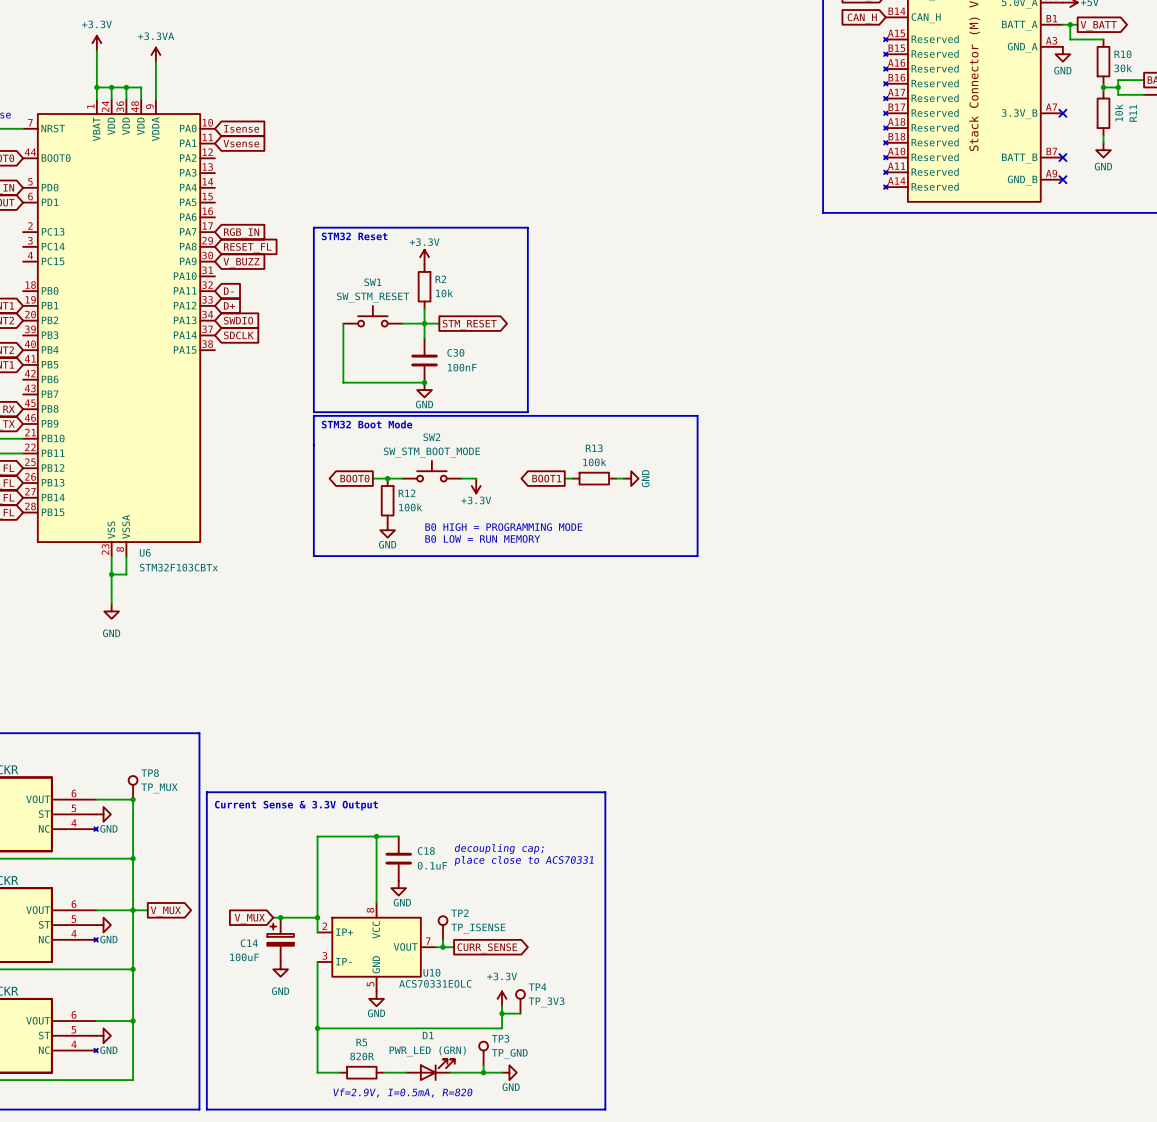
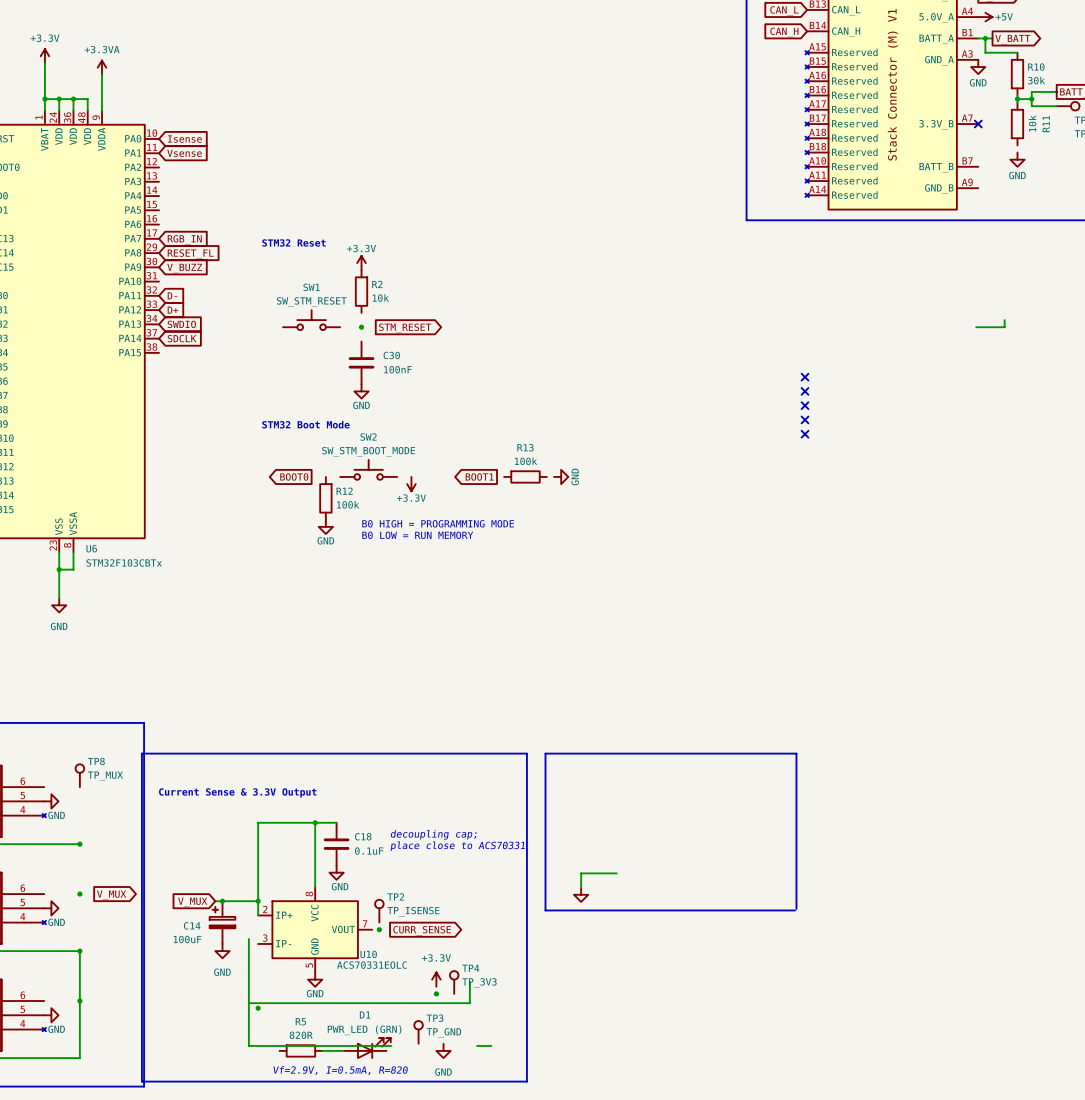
wire: (1103, 135) (1103, 142) -> none
no-connect mark: (1062, 157) -> none
no-connect mark: (1062, 179) -> none
line: (313, 227) (313, 412) (527, 412) (527, 227) (313, 227) -> none
wire: (424, 308) (424, 338) -> none
wire: none -> (1004, 320) (1004, 327) (976, 327)
wire: (343, 323) (343, 382) (424, 382) -> none
wire: (402, 323) (439, 323) -> none
no-connect mark: none -> (805, 377)
junction: (424, 382) -> none
no-connect mark: none -> (805, 391)
no-connect mark: none -> (805, 405)
line: (313, 415) (313, 556) (697, 556) (697, 415) (313, 415) -> none
no-connect mark: none -> (805, 419)
no-connect mark: none -> (805, 434)
wire: (372, 478) (402, 478) -> none
junction: (387, 478) -> none
wire: (461, 478) (476, 478) -> none
wire: (564, 478) (572, 478) -> none
wire: (616, 478) (623, 478) -> none
line: (206, 792) (605, 792) (605, 1109) (206, 1109) (206, 792) -> (141, 753) (141, 1081) (526, 1081) (526, 753) (141, 753)
wire: (96, 799) (133, 799) (133, 969) -> none
junction: (133, 799) -> none
wire: none -> (616, 873) (581, 873) (581, 887)
wire: (96, 910) (147, 910) -> none
power symbol: none -> (581, 894)
line: none -> (796, 909) (796, 753) (545, 753) (545, 910) (795, 910)
wire: (442, 939) (442, 947) -> none
wire: (435, 947) (454, 947) -> none
wire: none -> (248, 938) (248, 1045) (391, 1045)
wire: (317, 961) (317, 1072) (339, 1072) -> none
wire: none -> (469, 981) (469, 1003) (248, 1003)
wire: (502, 1006) (502, 1028) (317, 1028) -> none
wire: (502, 1013) (520, 1013) -> none
wire: (96, 1021) (133, 1021) -> none
wire: (483, 1065) (483, 1072) -> none
wire: none -> (477, 1045) (491, 1045)
wire: (450, 1072) (502, 1072) -> none
junction: (483, 1072) -> none
power symbol rotation: 0° (509, 1072) -> 90° clockwise (443, 1050)

